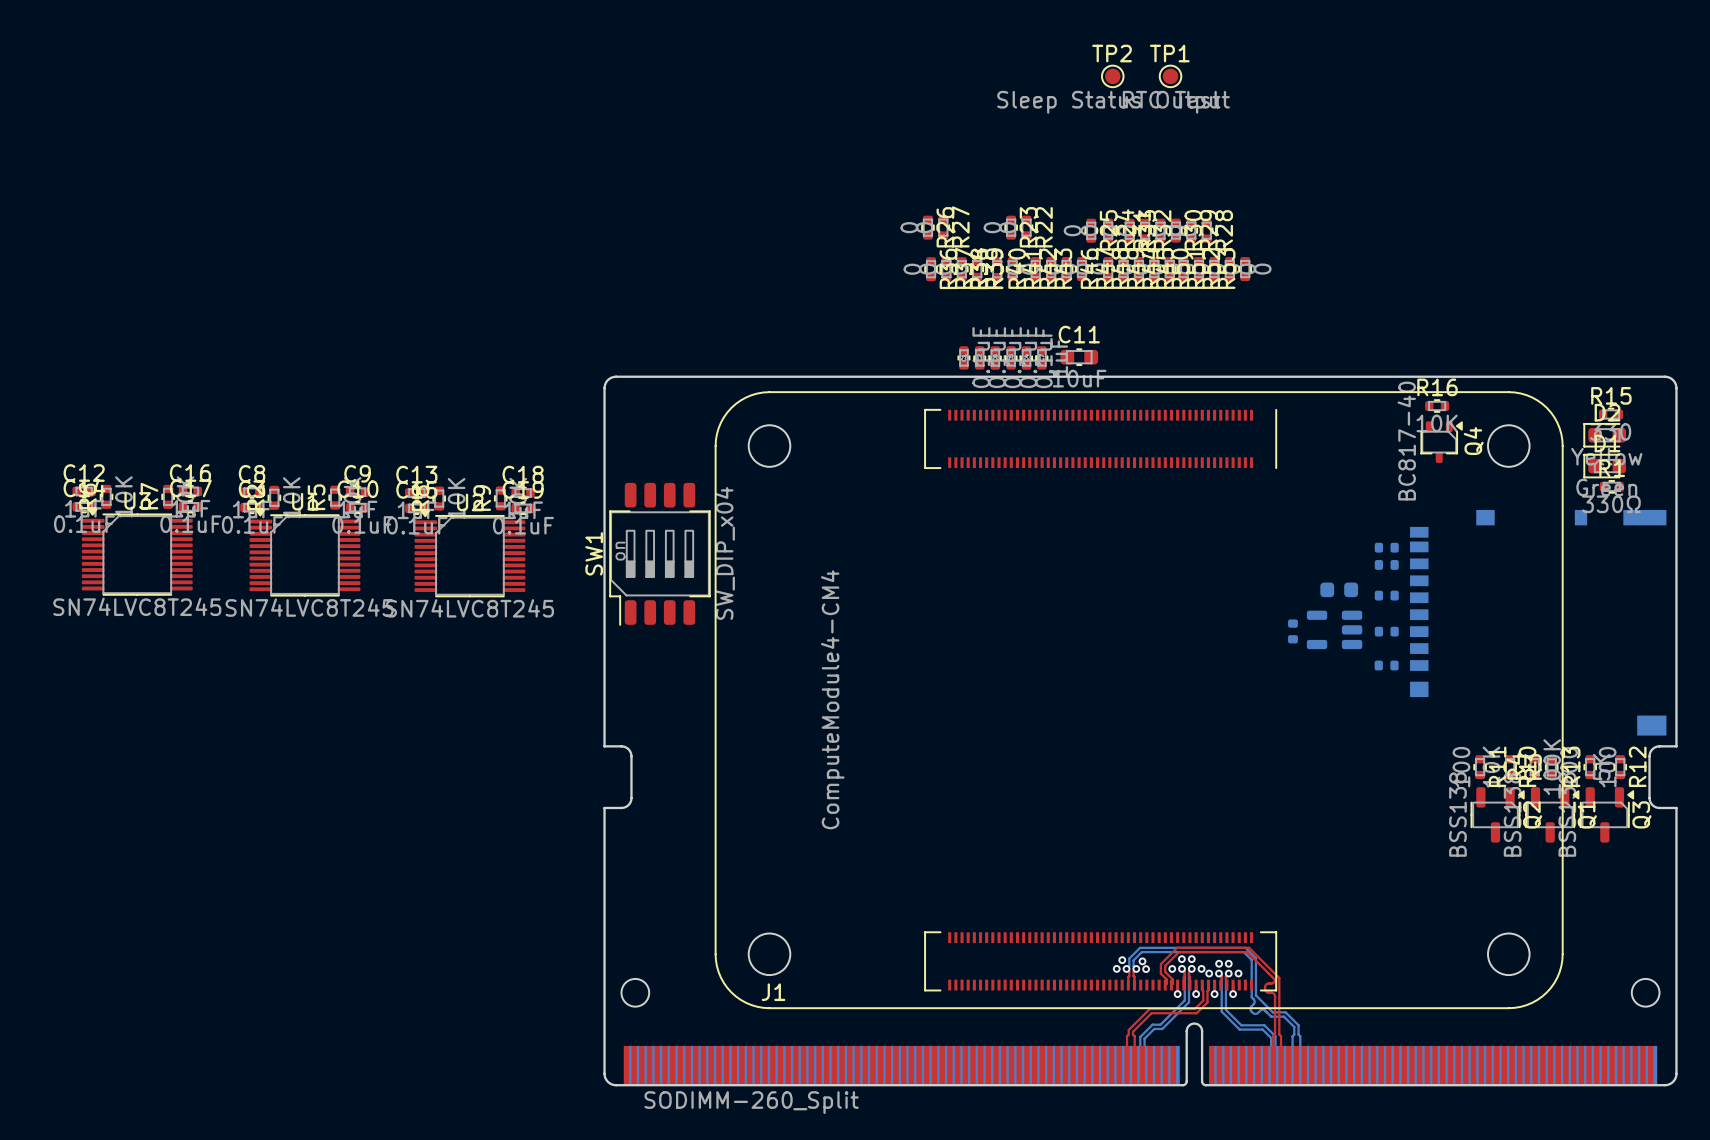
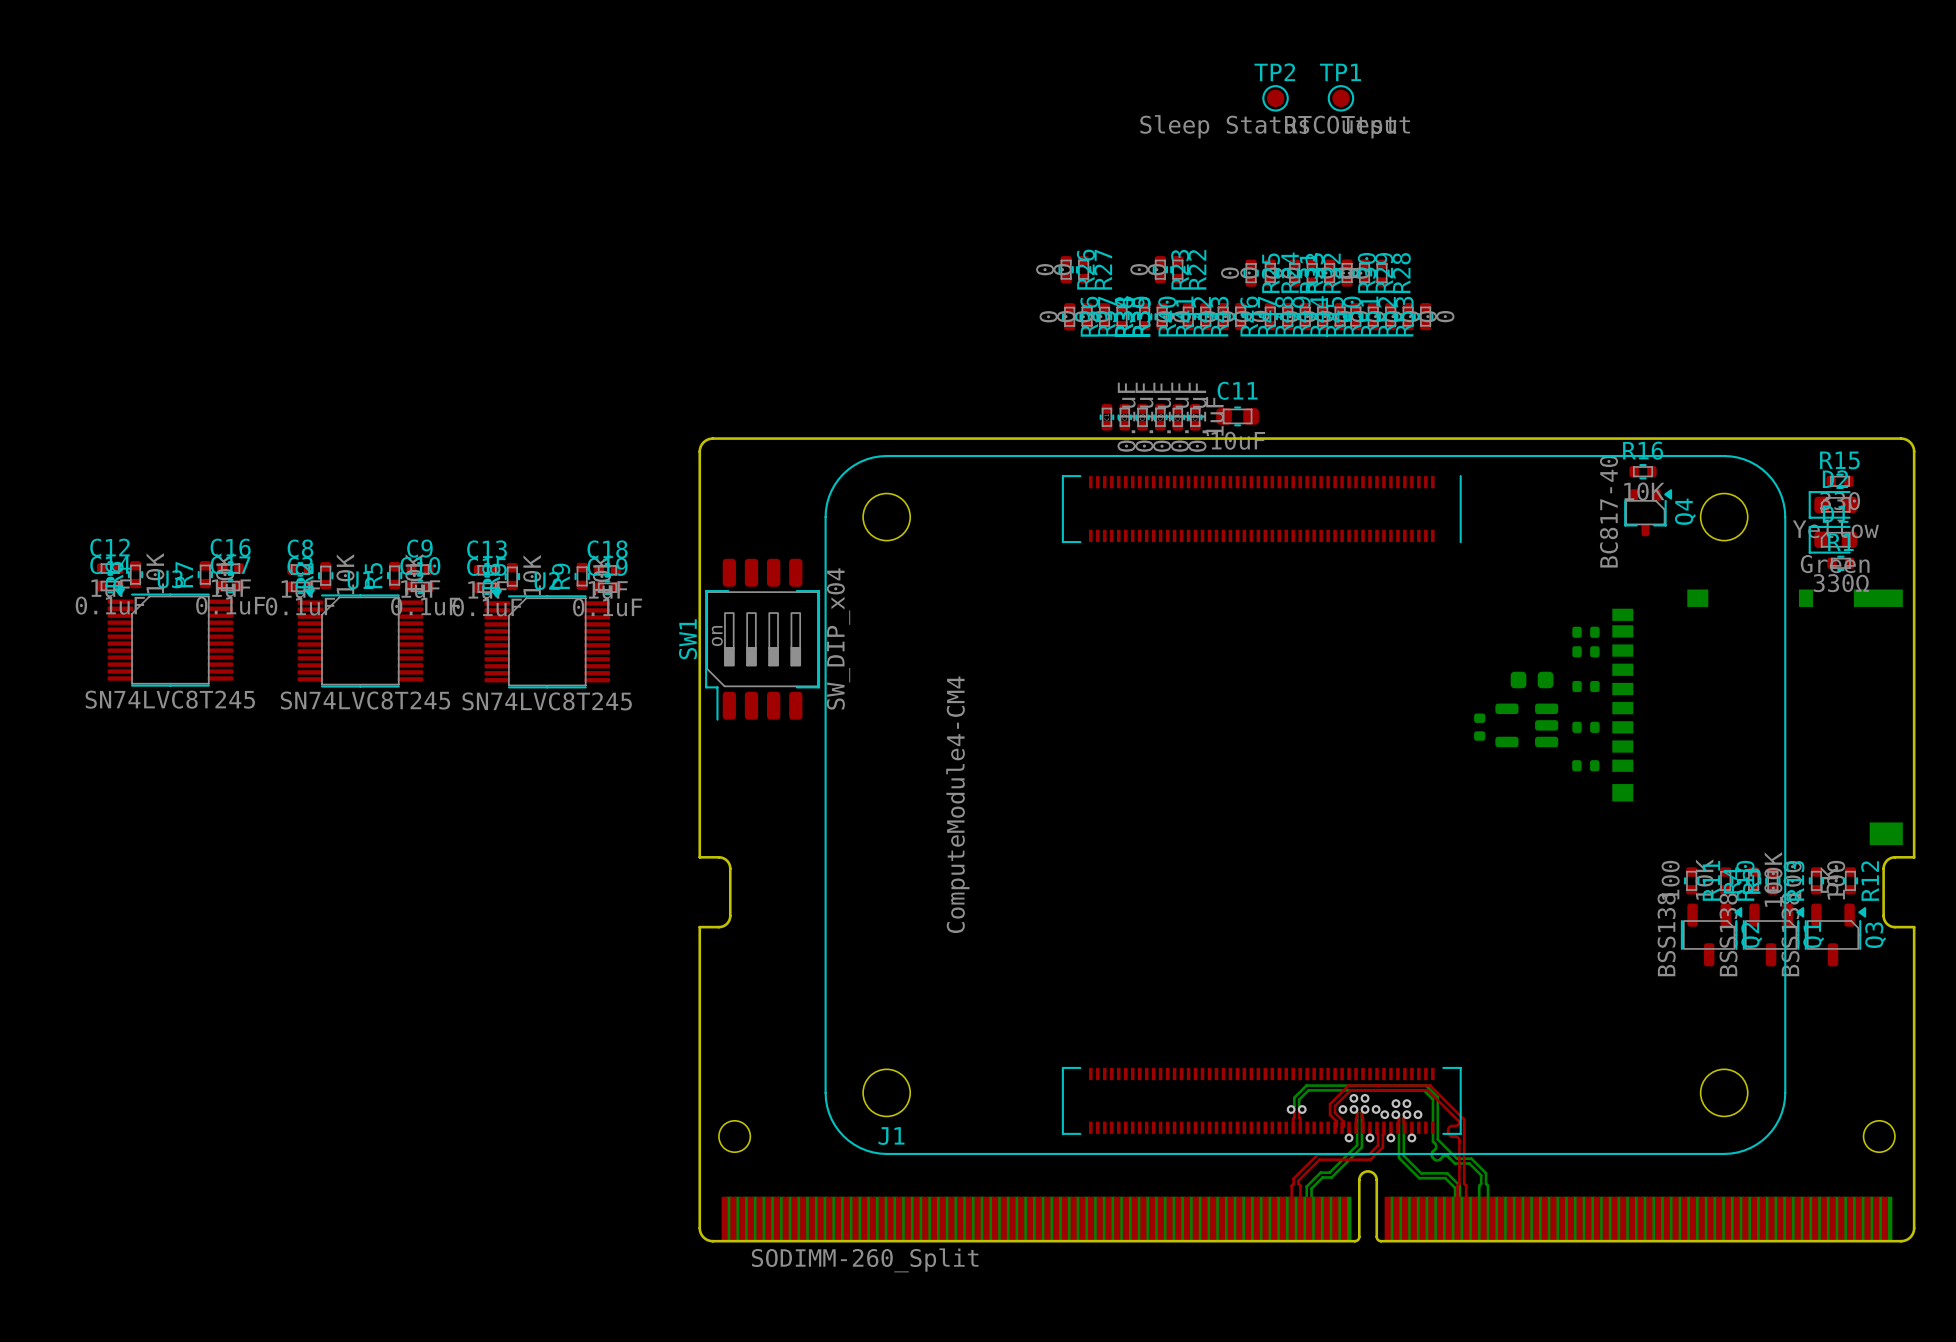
via: (1122, 960) -> none
via: (1142, 961) -> none
via: (1116, 968) -> none
via: (1146, 969) -> none

